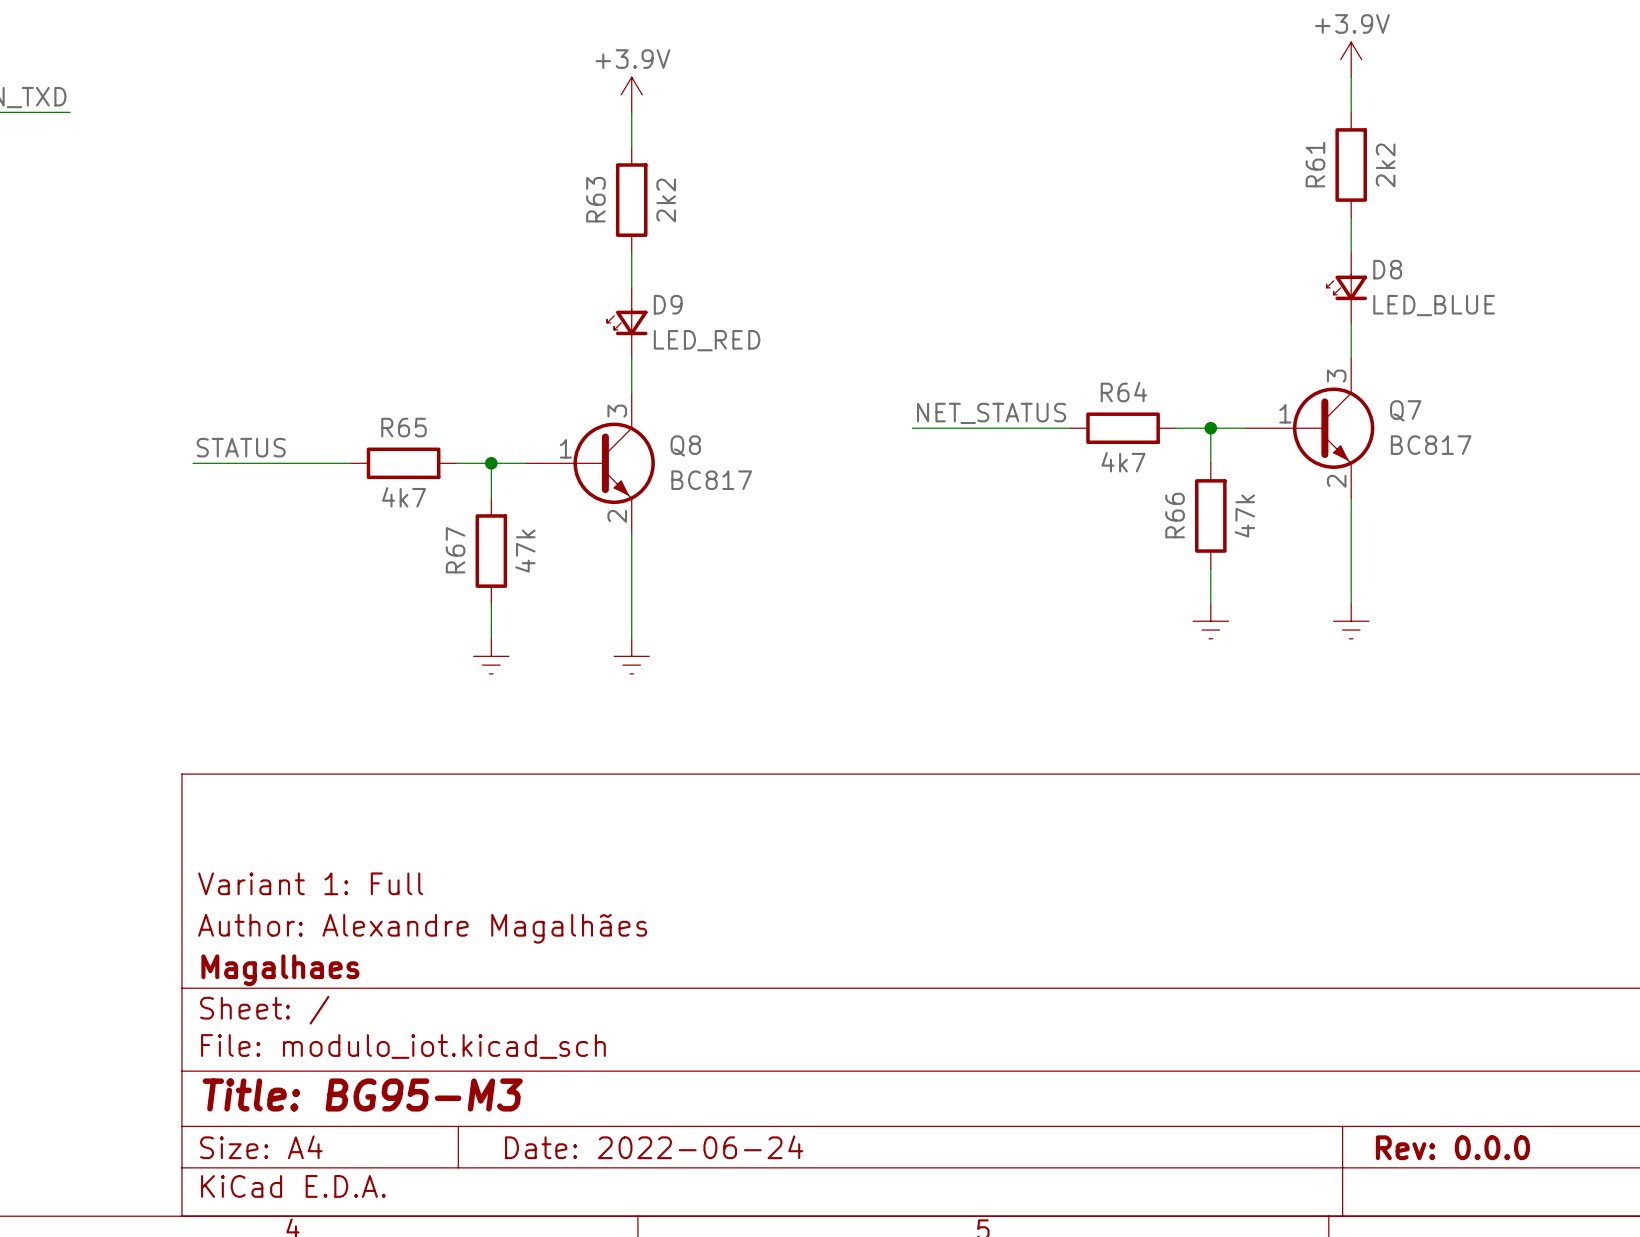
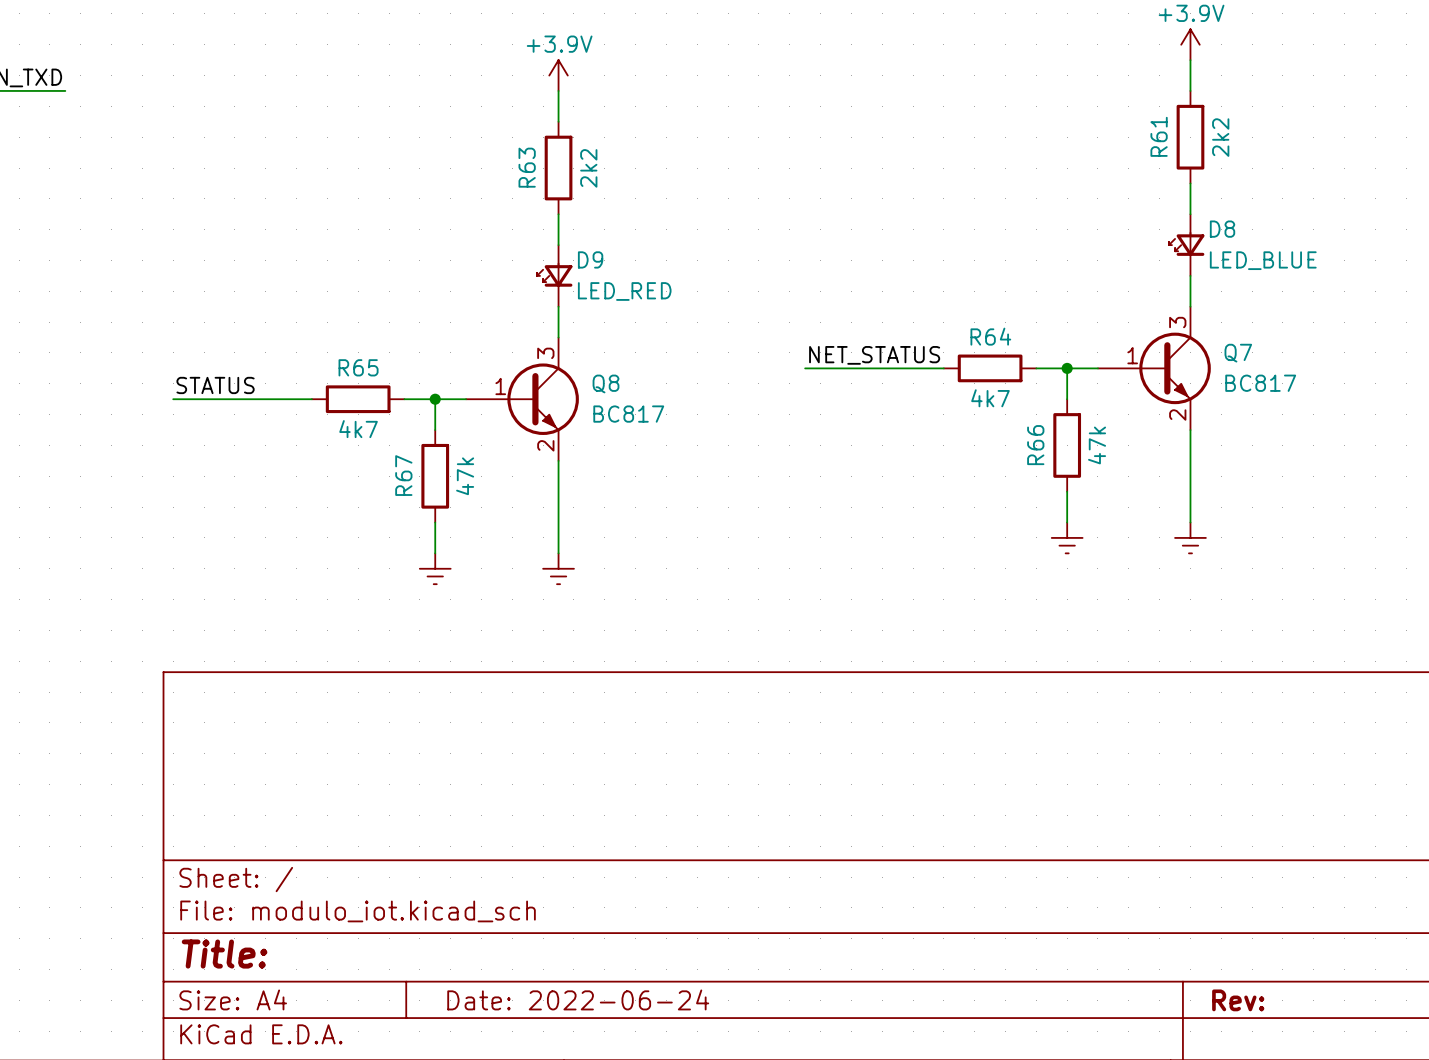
title block: Variant 1: Full (310, 883) -> none
title block: Author: Alexandre Magalhães (422, 928) -> none
title block: Magalhaes (280, 970) -> none
title block: Title: BG95-M3 (362, 1094) -> Title: (224, 954)
title block: Rev: 0.0.0 (1452, 1147) -> Rev: (1238, 1000)

